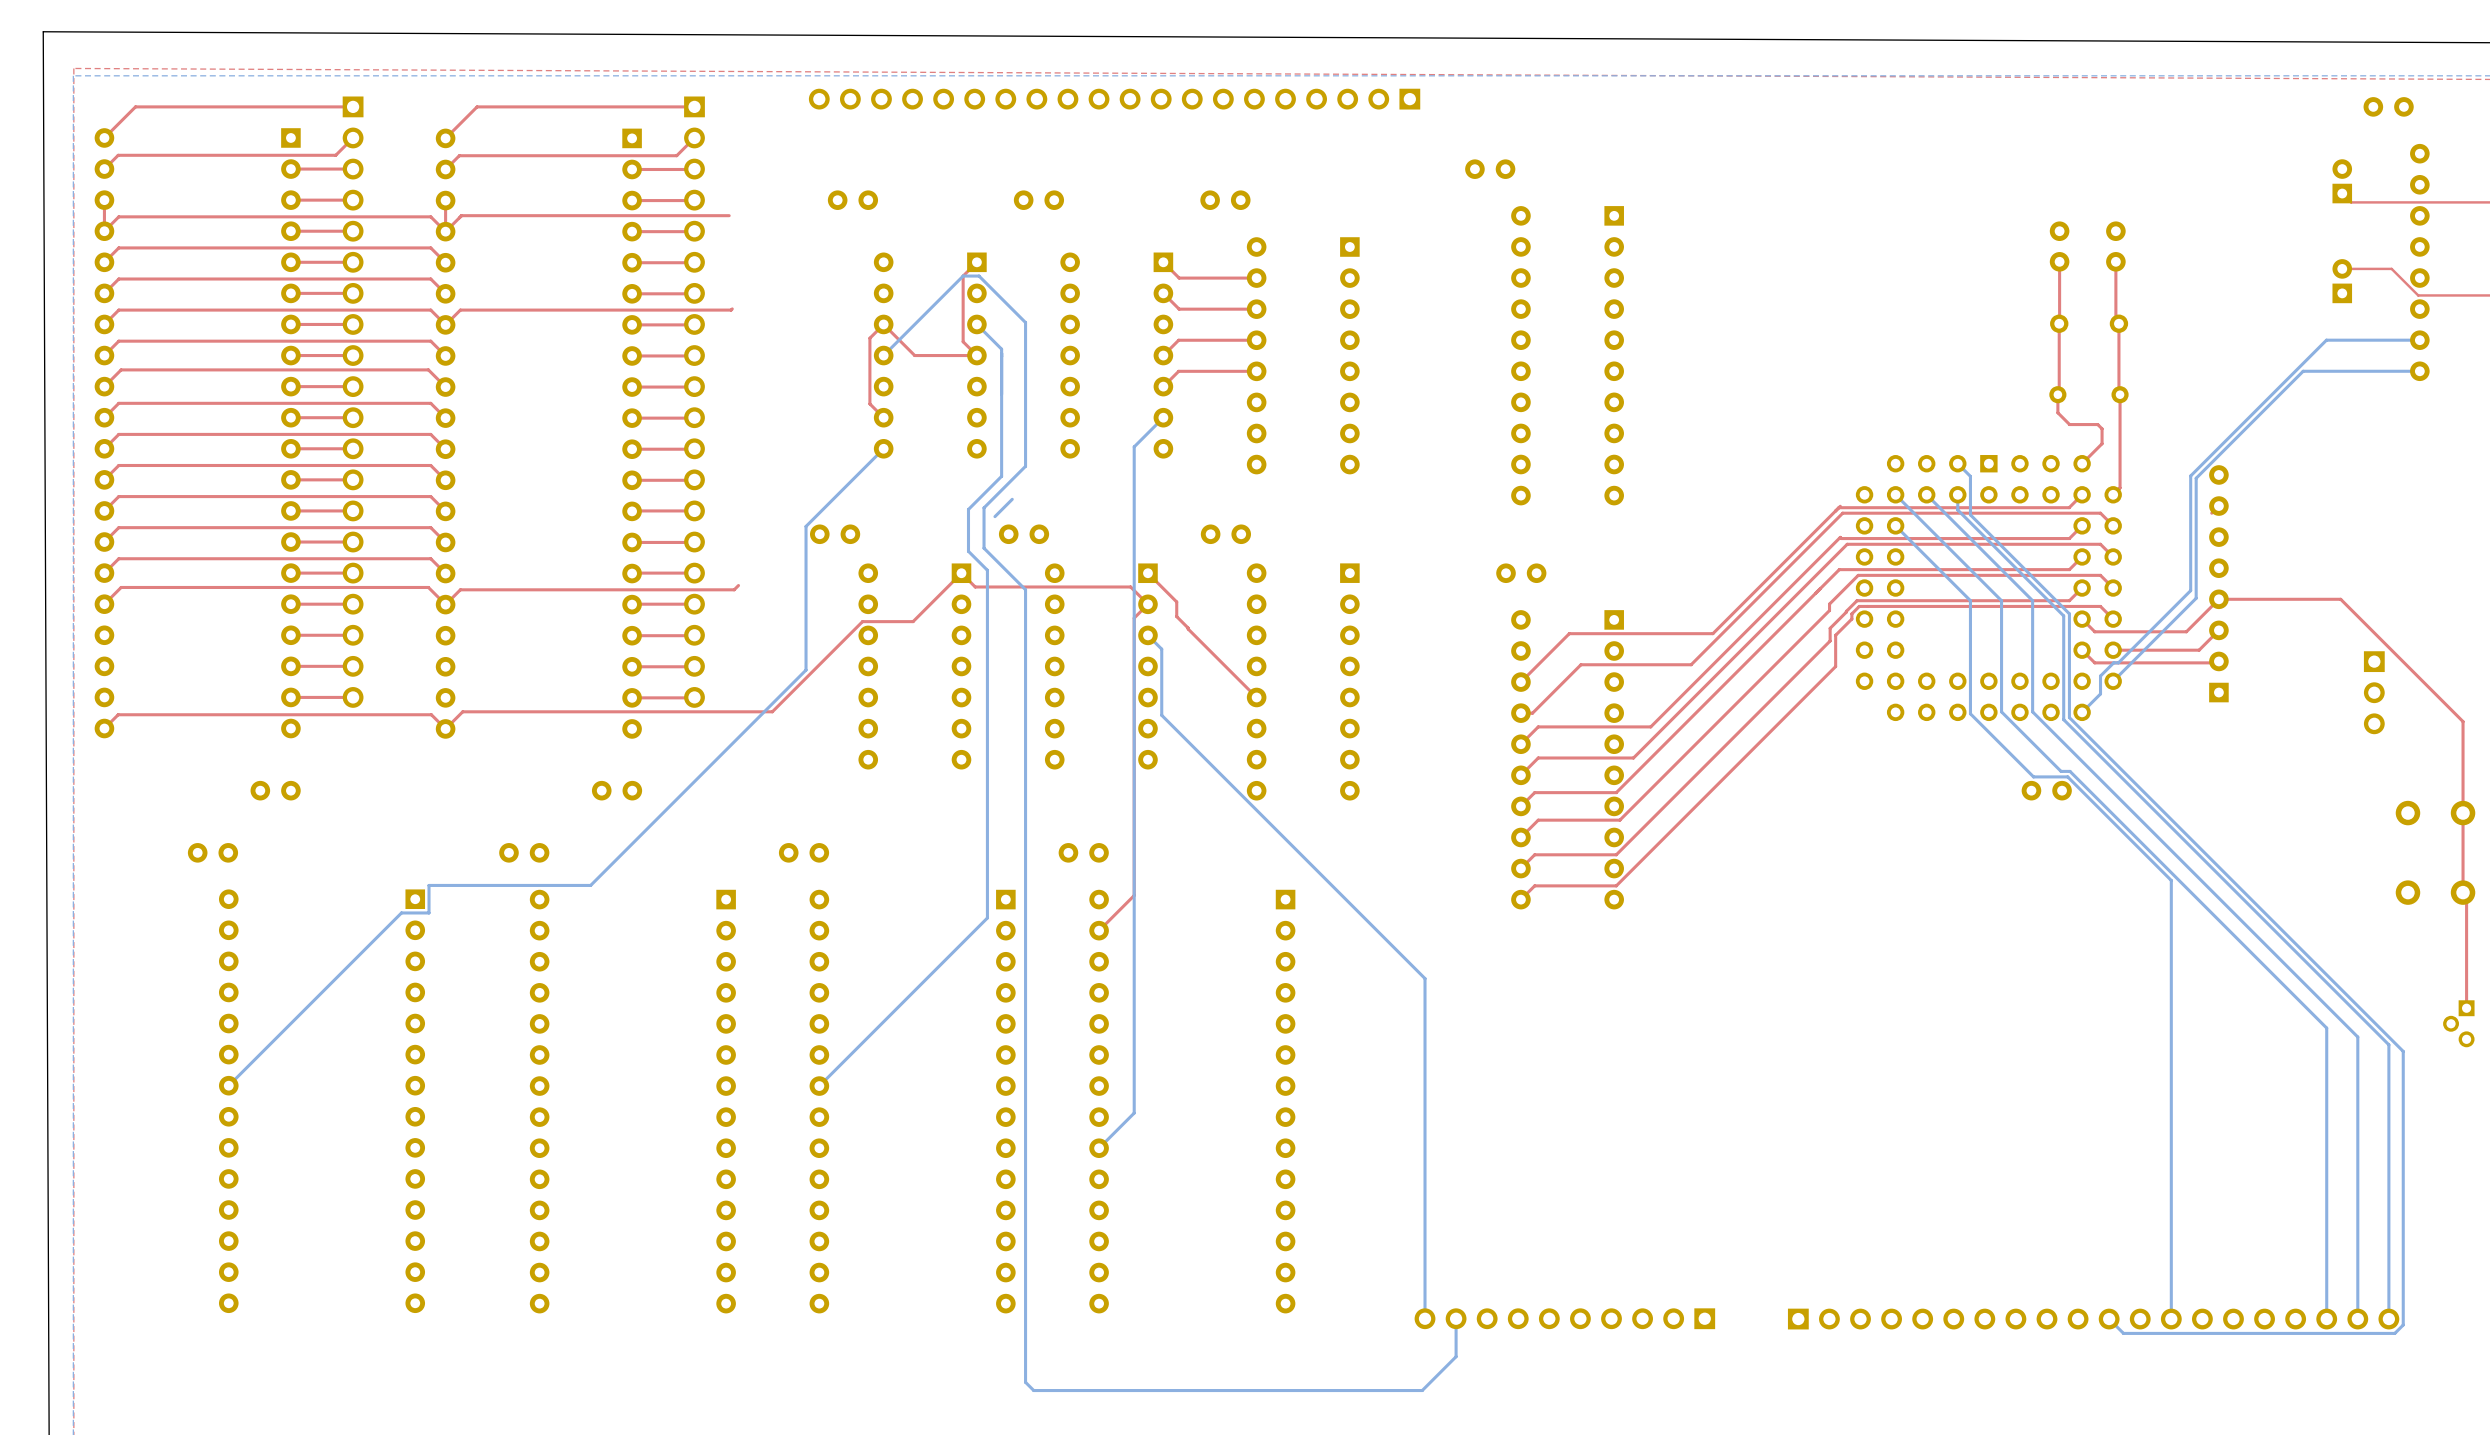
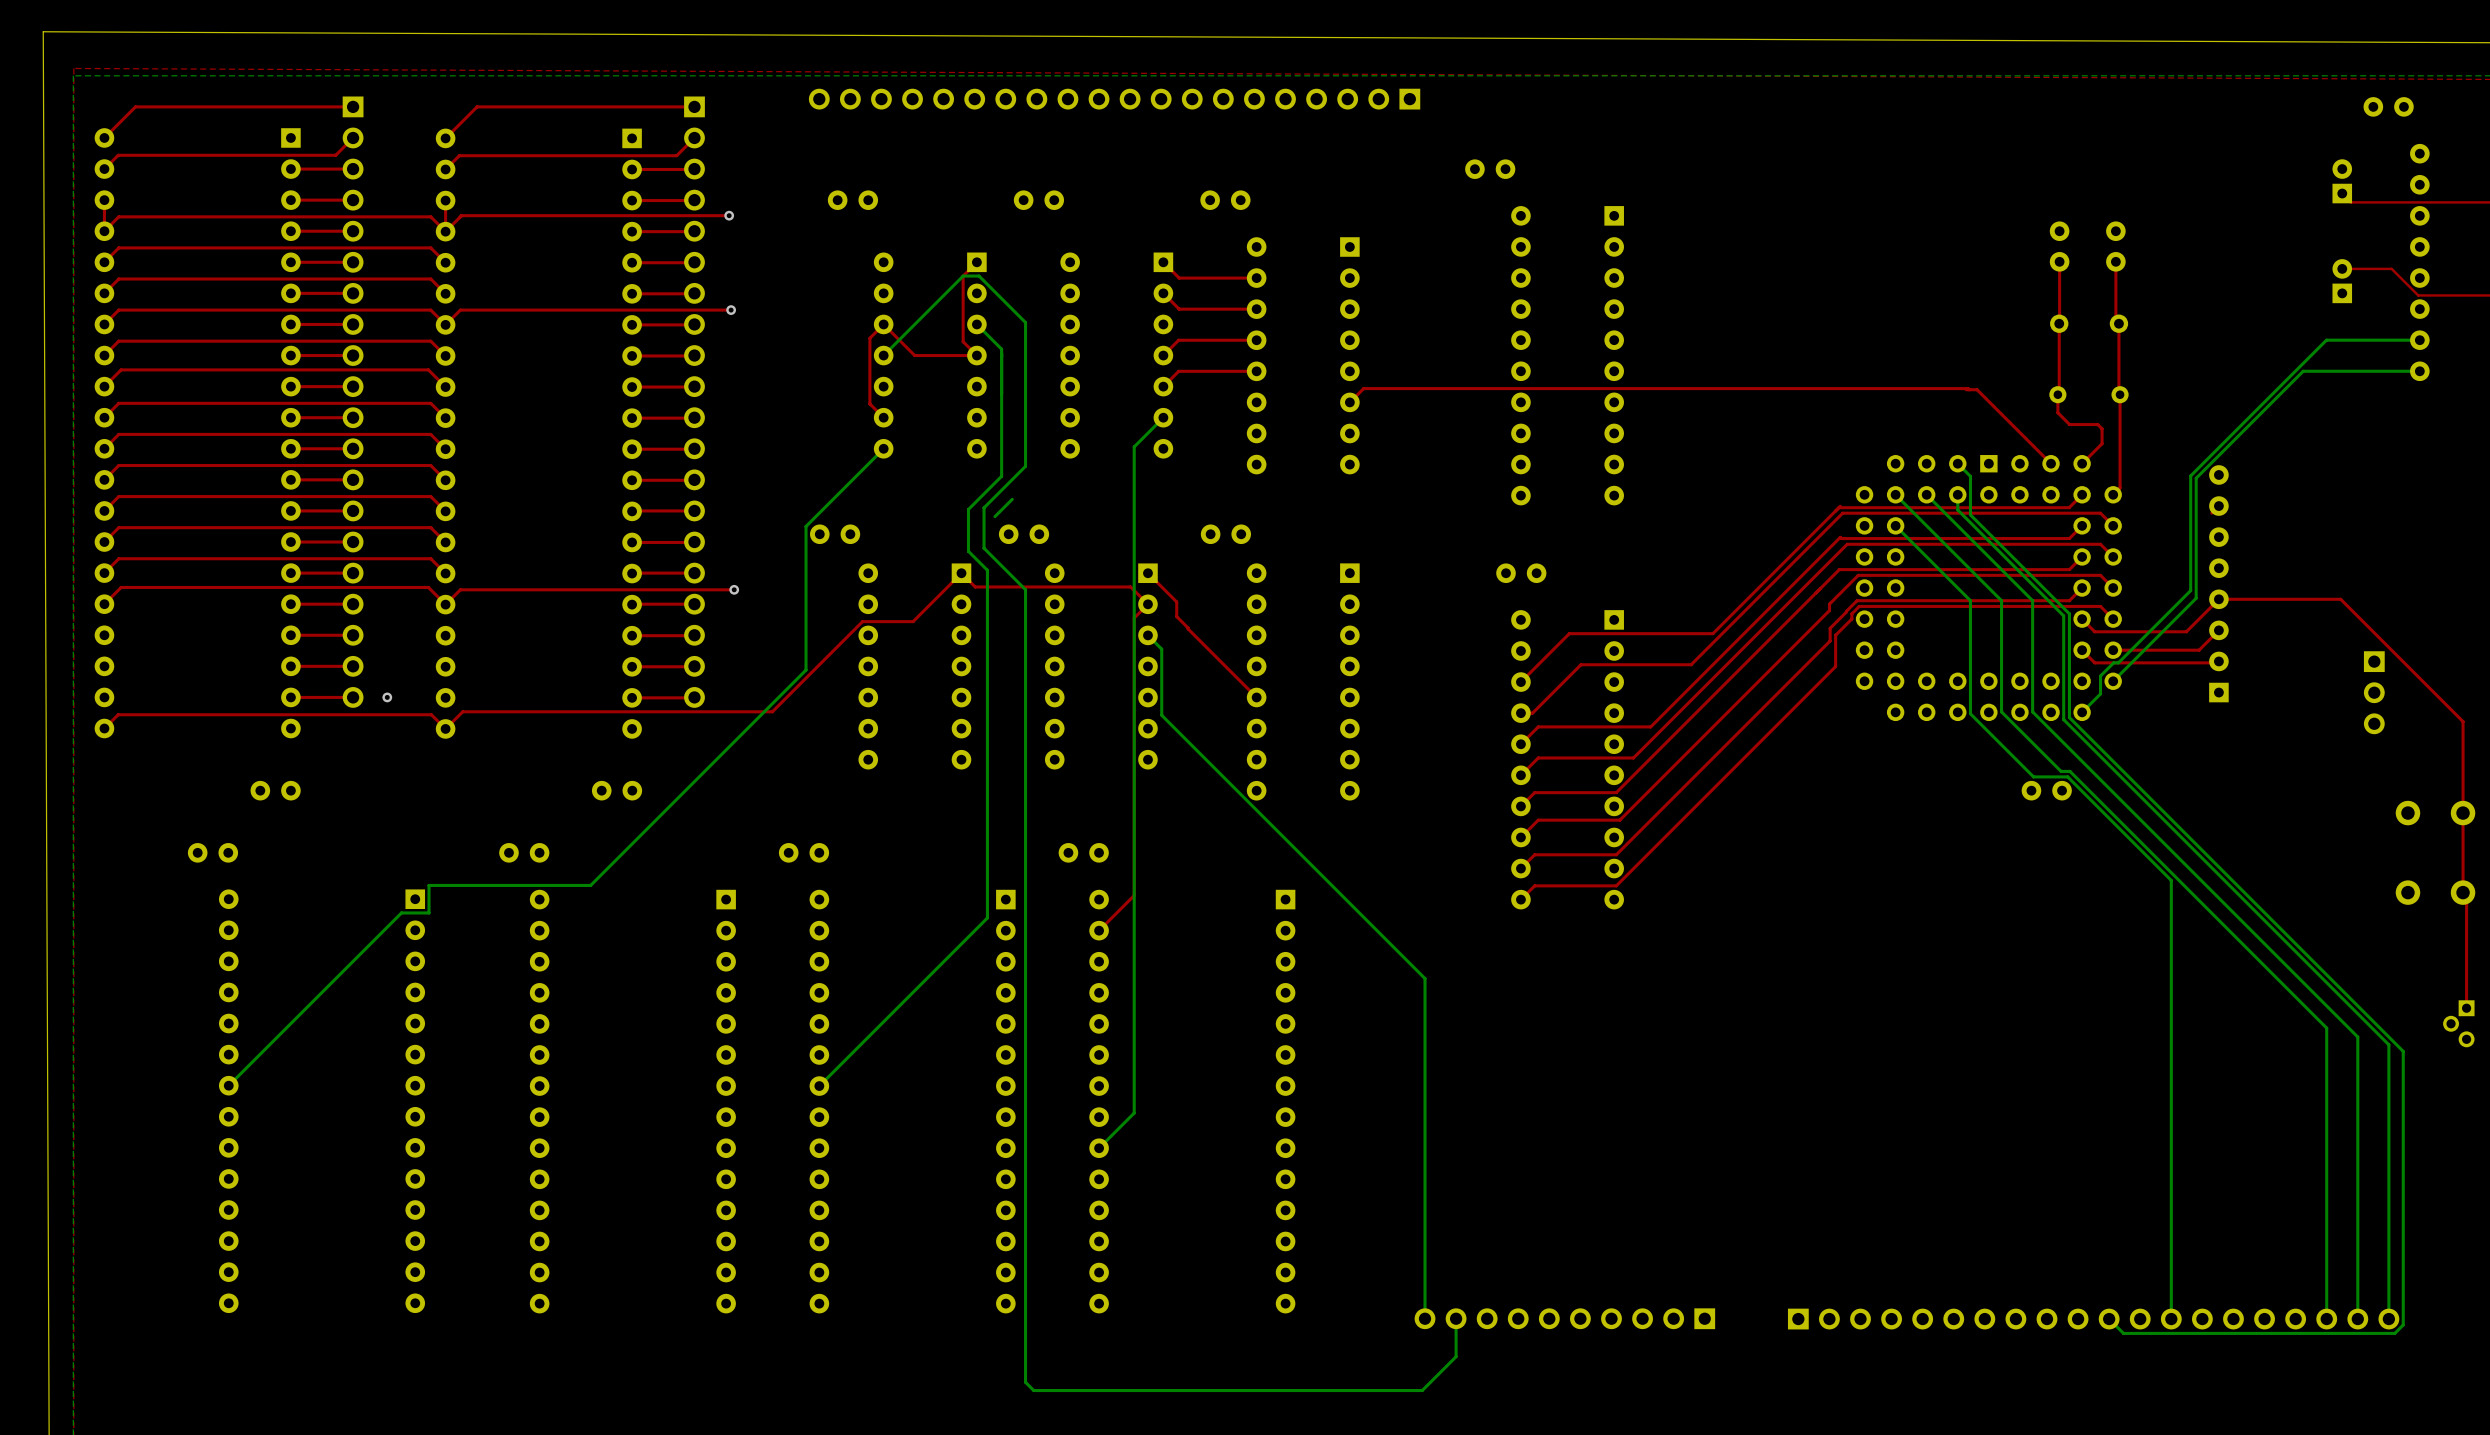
via: none -> (729, 215)
via: none -> (731, 310)
top track: none -> (1966, 389) (1977, 389) (2051, 463)
top track: none -> (1969, 389) (1363, 388) (1349, 402)
top track: (738, 585) (734, 589) -> none
via: none -> (734, 589)
via: none -> (387, 697)

